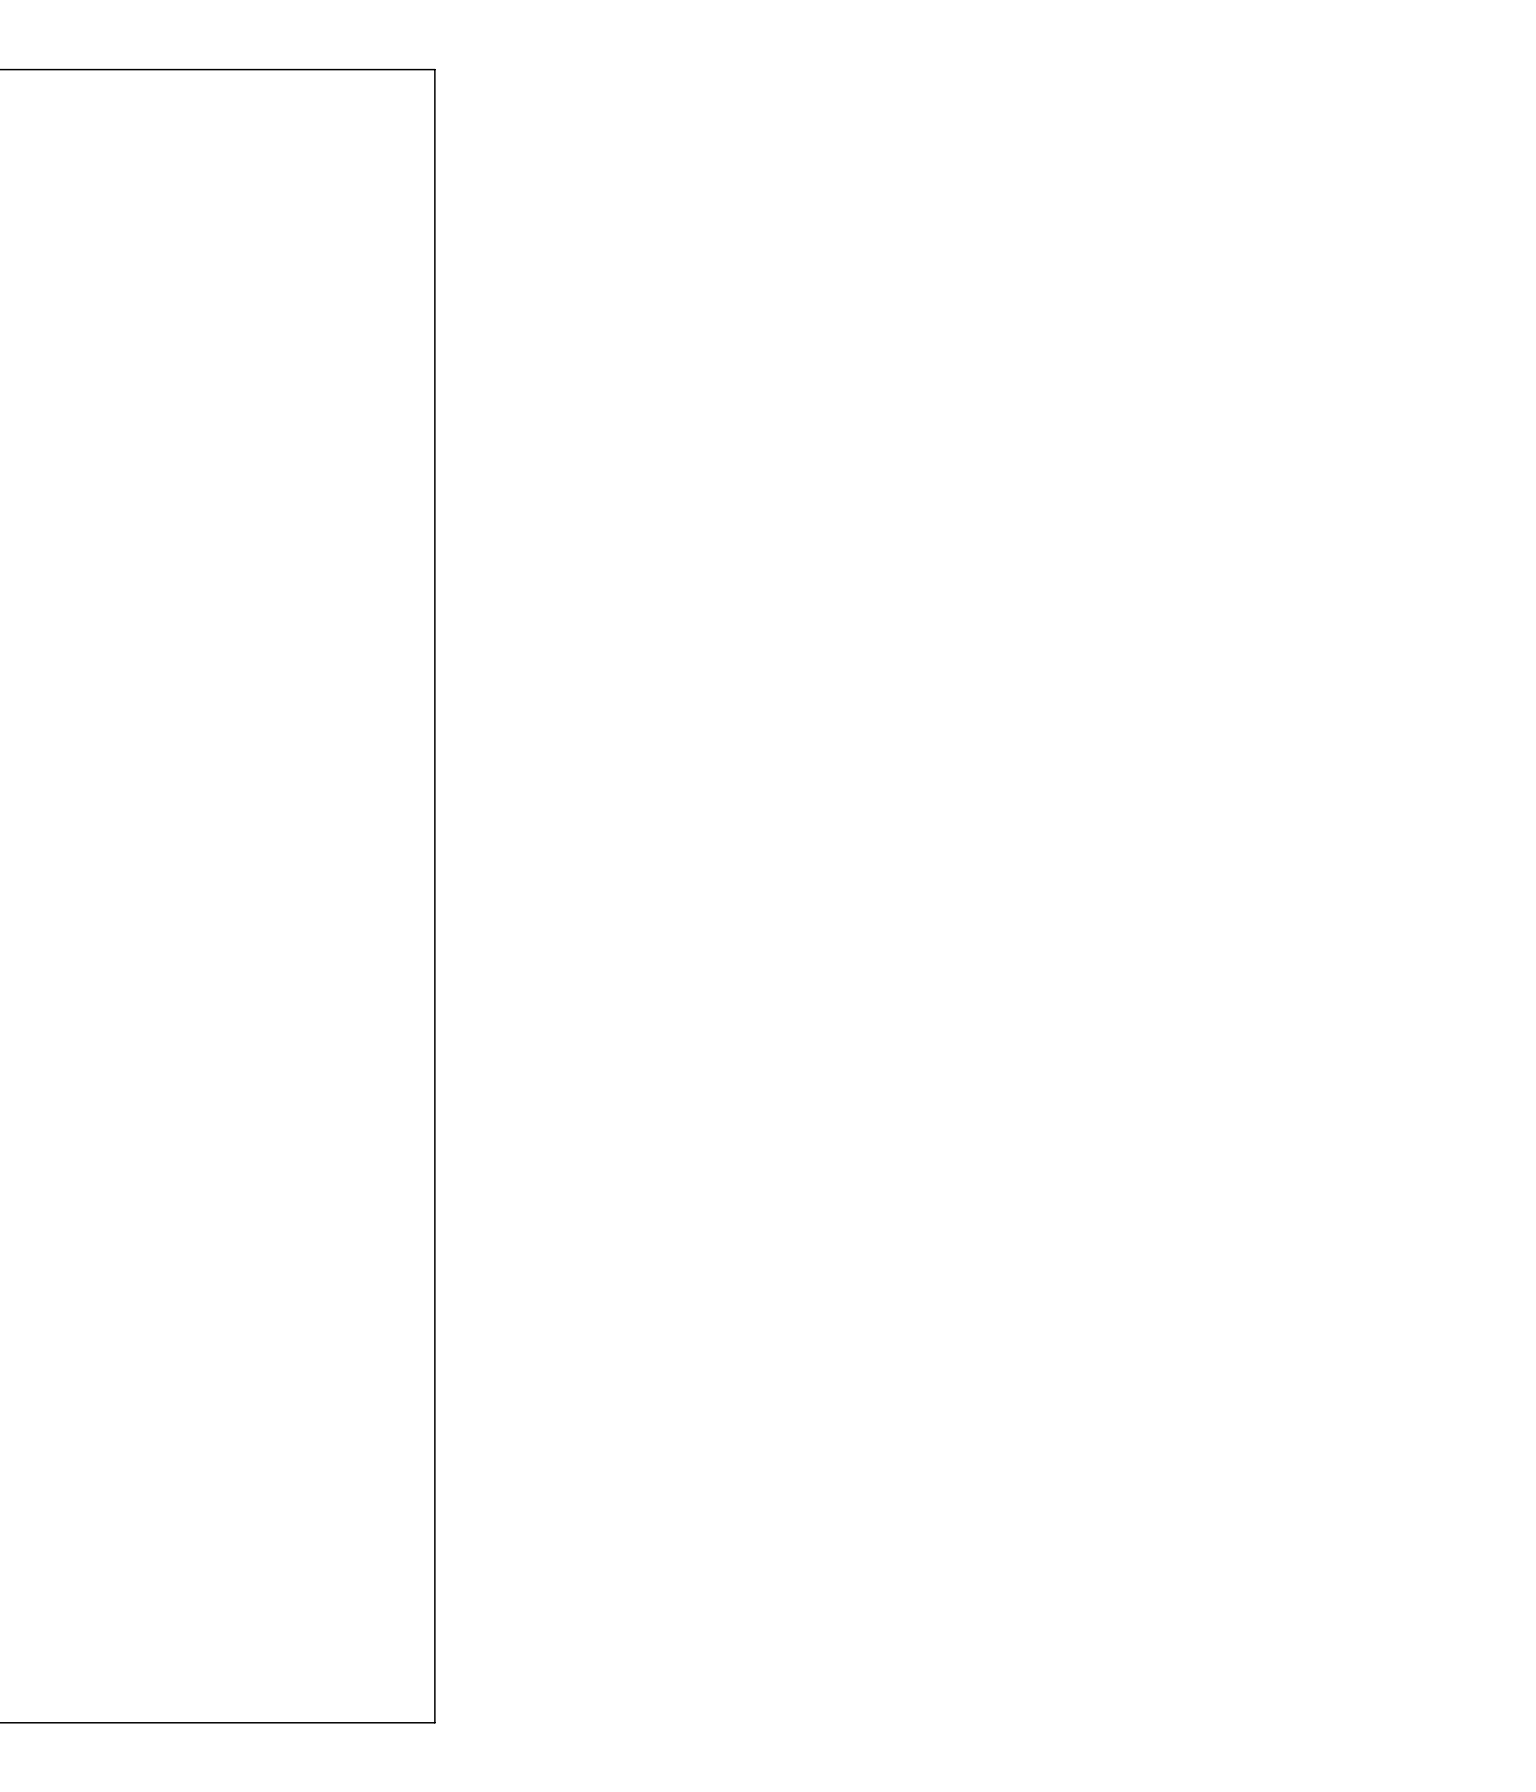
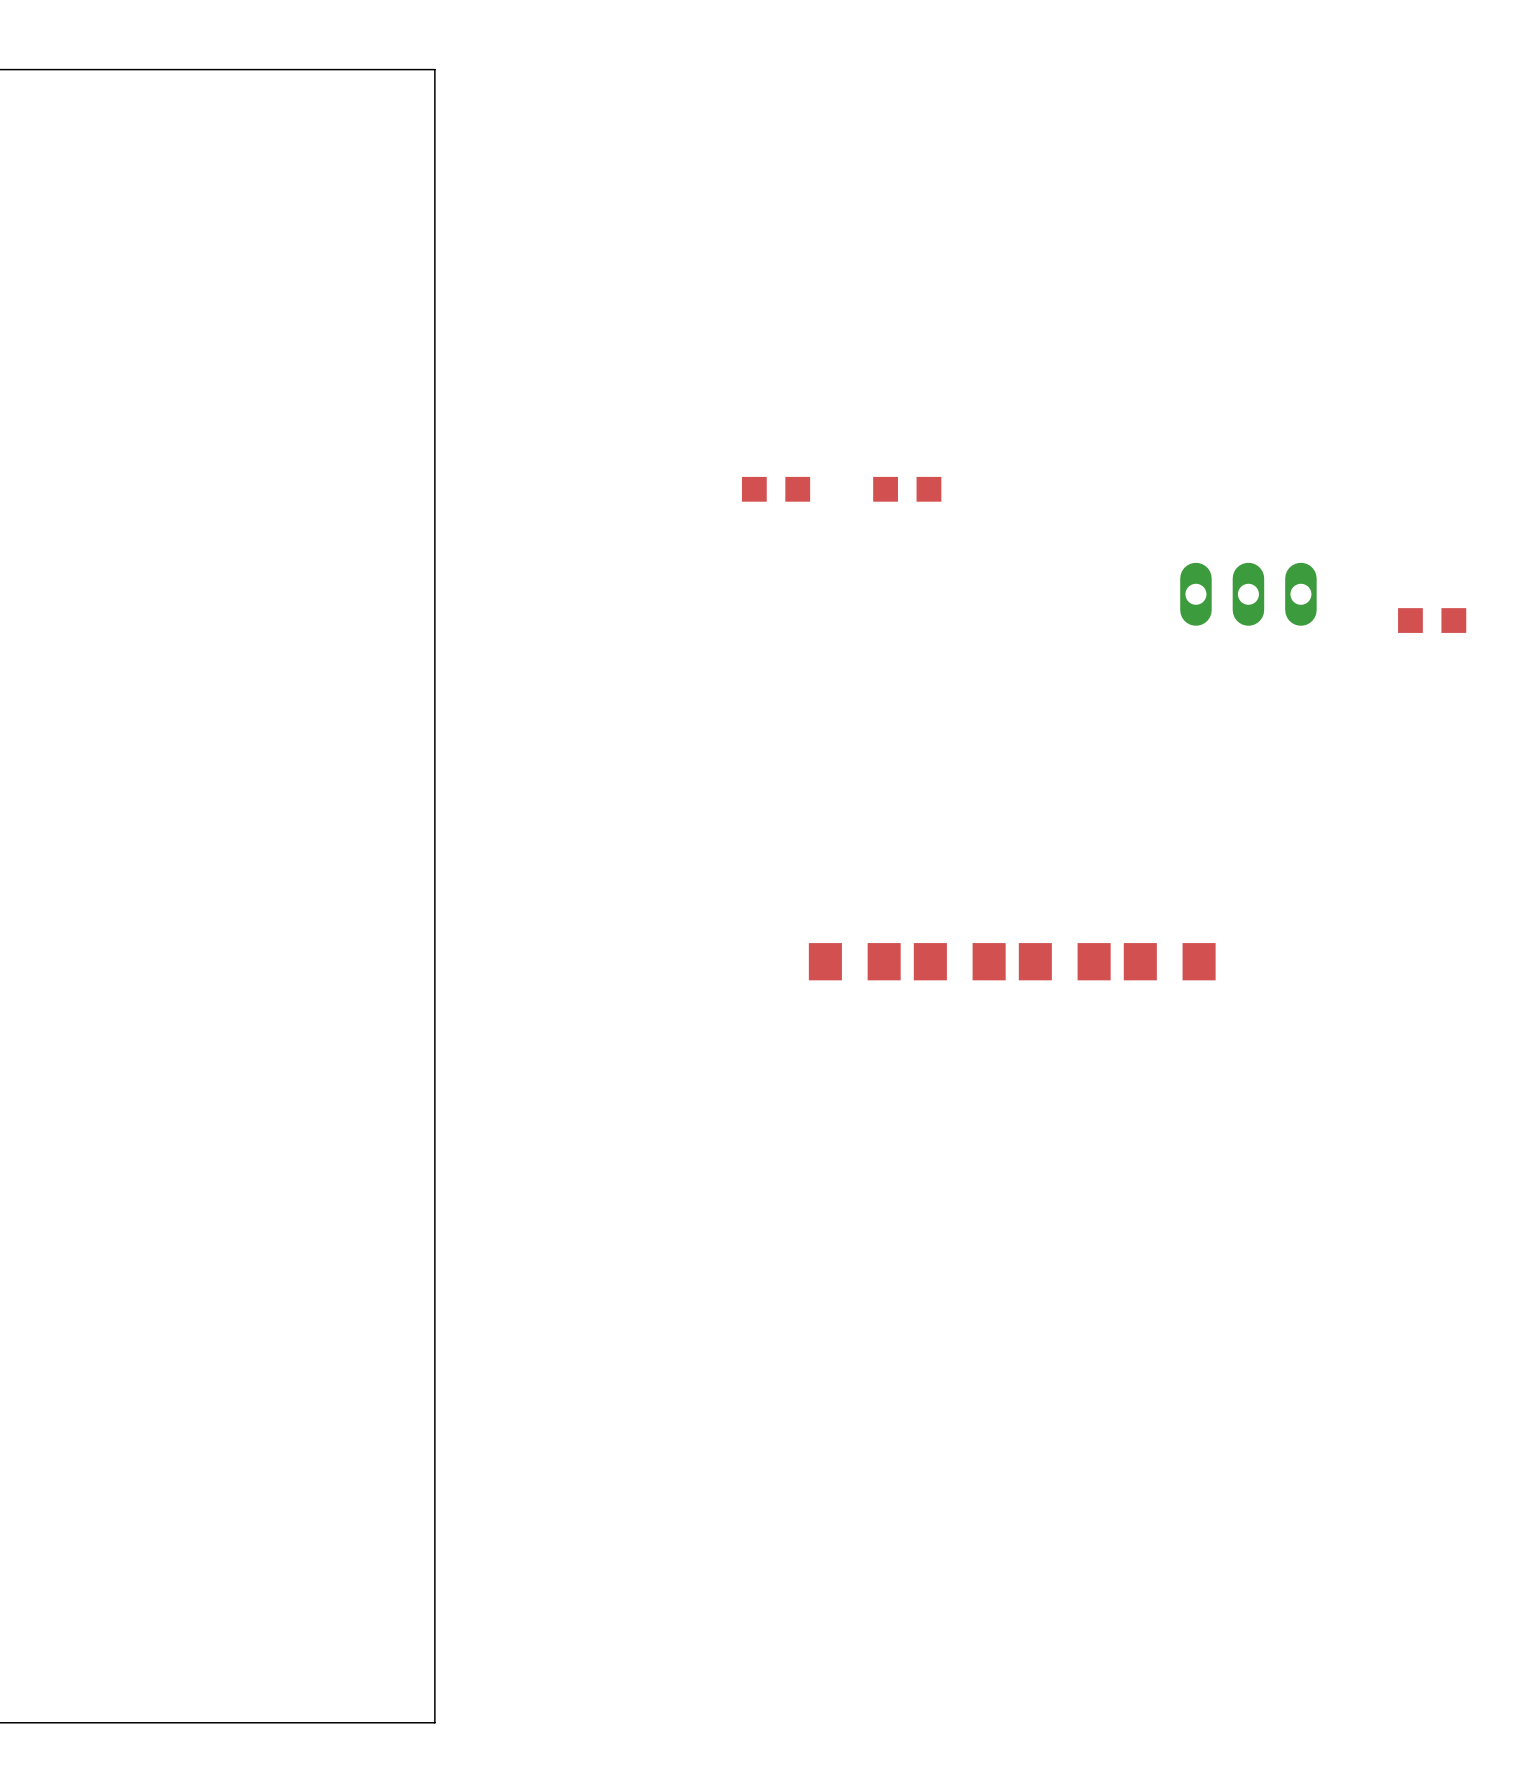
part: none -> (776, 489)
part: none -> (907, 489)
part: none -> (1248, 594)
part: none -> (1432, 620)
part: none -> (854, 961)
part: none -> (959, 961)
part: none -> (1064, 961)
part: none -> (1169, 961)

